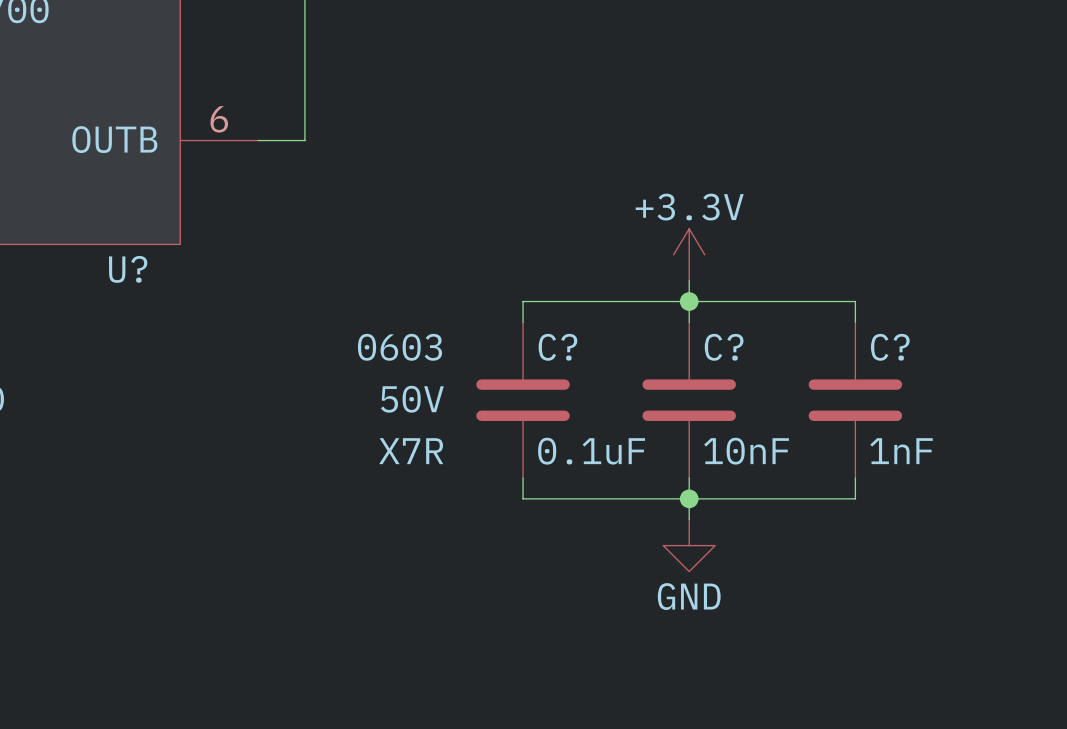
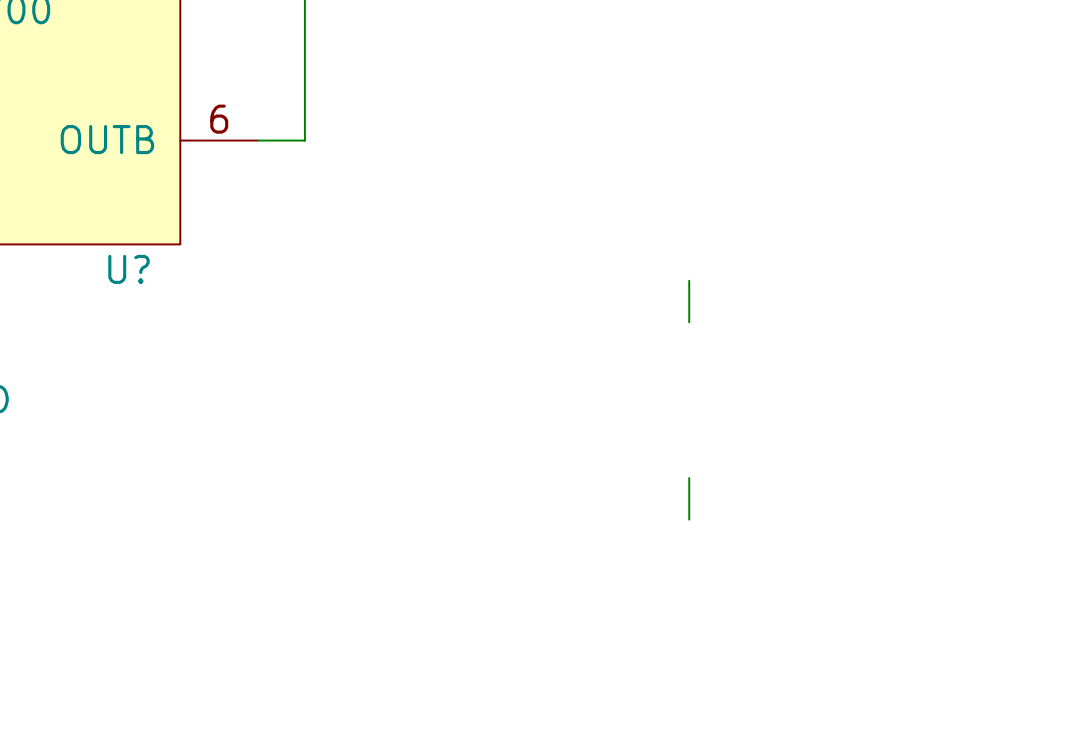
power symbol: +3.3V (689, 254) -> none
junction: (689, 301) -> none
wire: (523, 322) (523, 301) (855, 301) (855, 322) -> none
C?: 0.1uF (523, 400) -> none
C?: 10nF (689, 400) -> none
C?: 1nF (855, 400) -> none
wire: (523, 478) (523, 498) (855, 498) (855, 478) -> none
junction: (689, 498) -> none
power symbol: GND (689, 545) -> none

